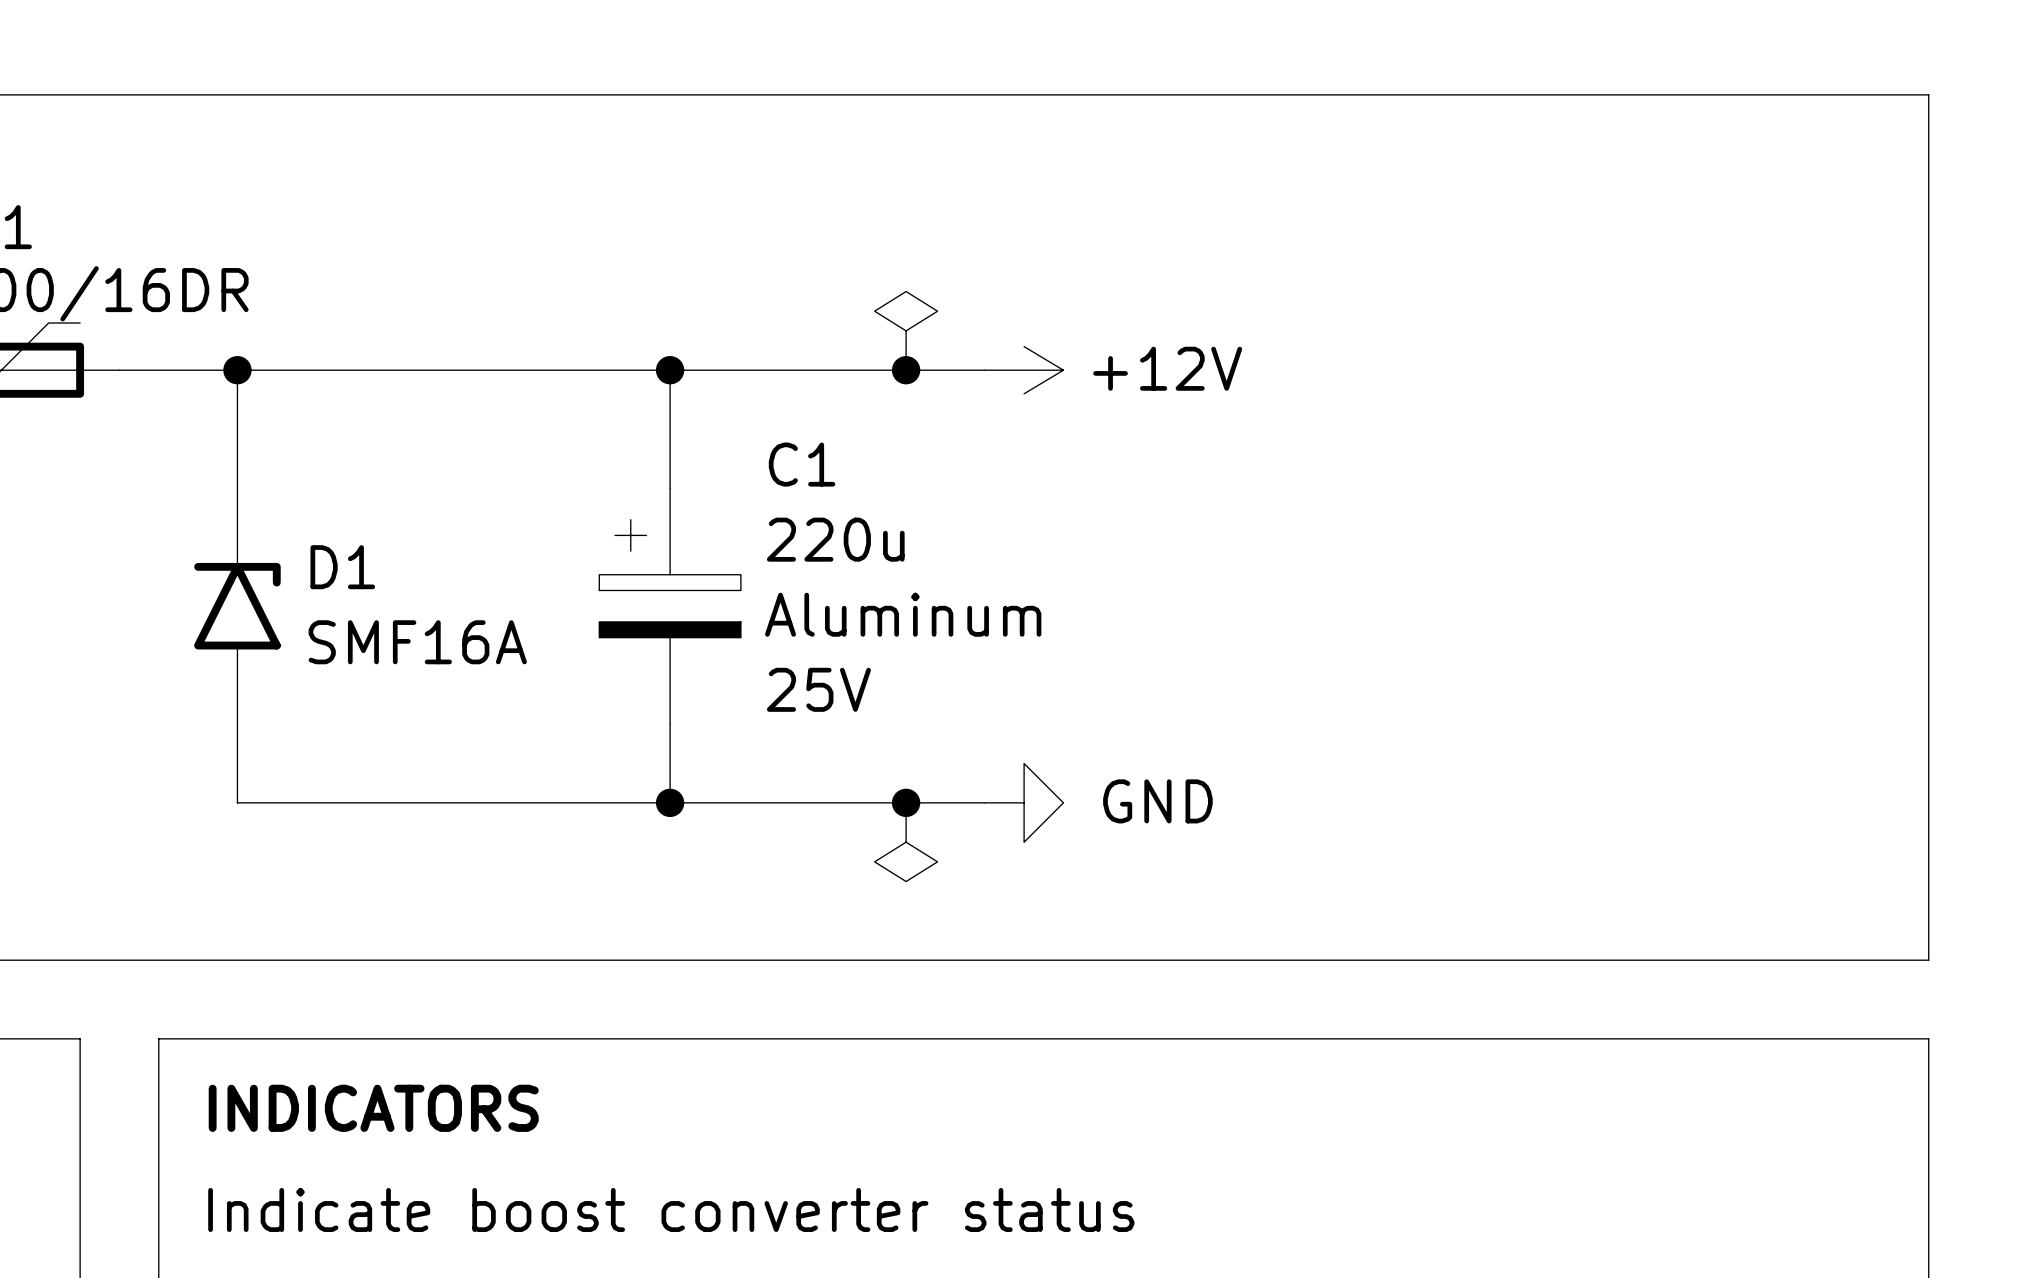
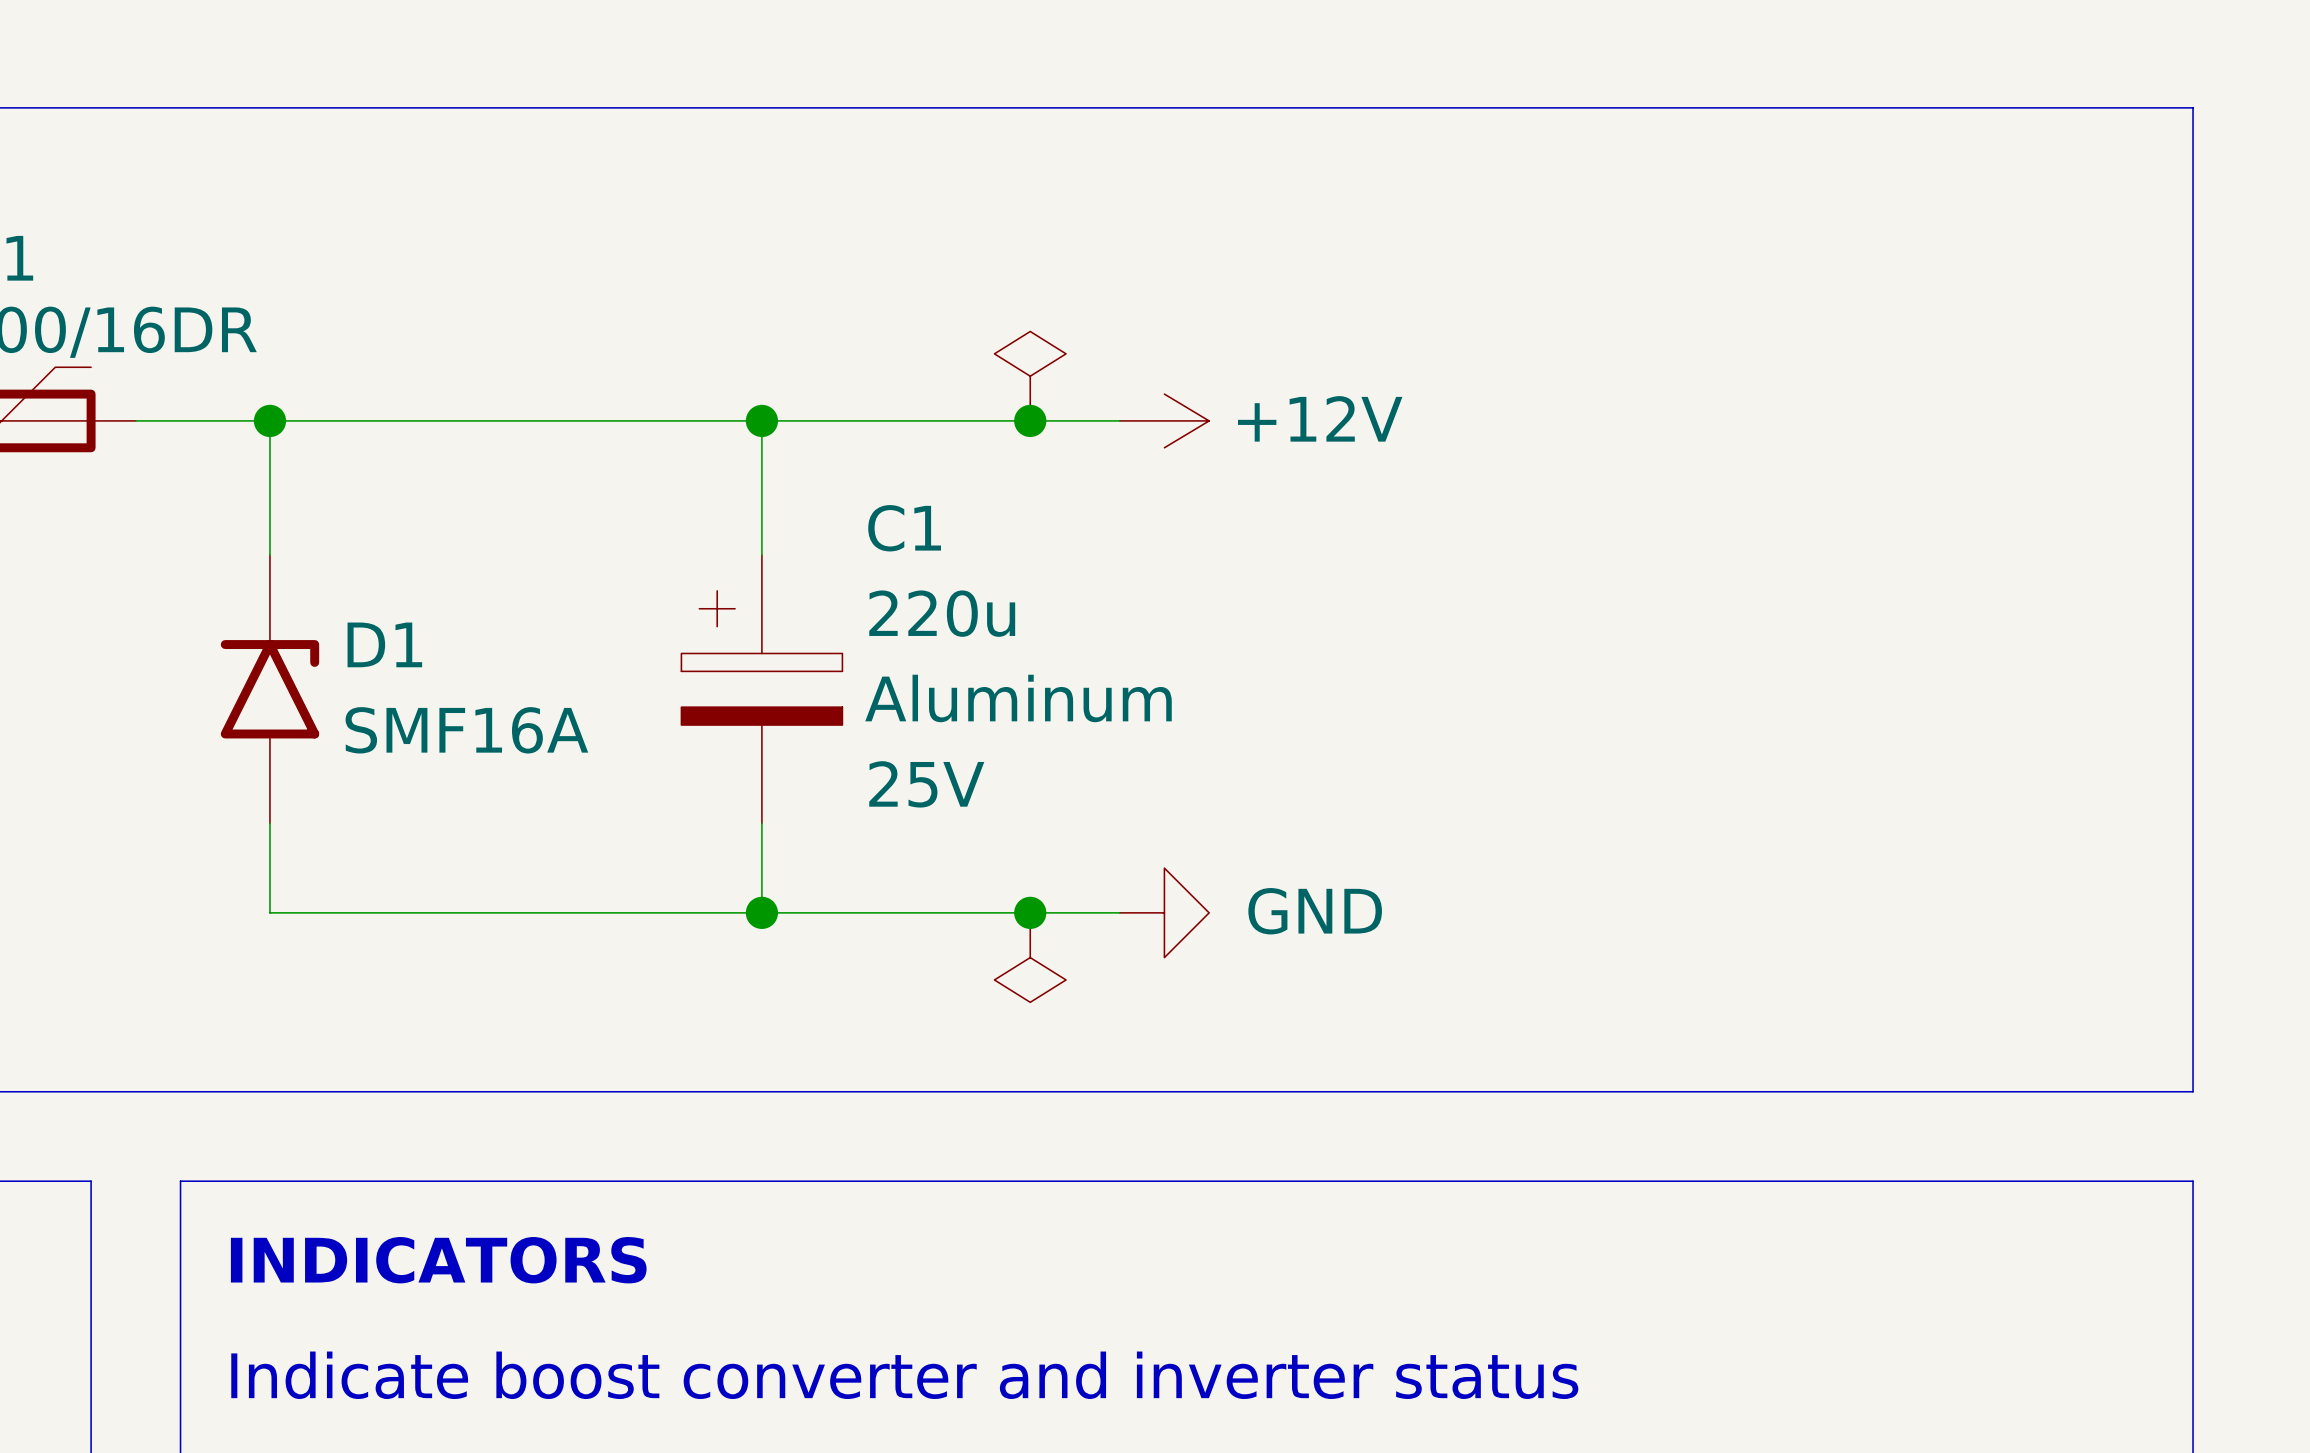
text: Indicate boost converter status (671, 1209) -> Indicate boost converter and inverter status (904, 1375)

